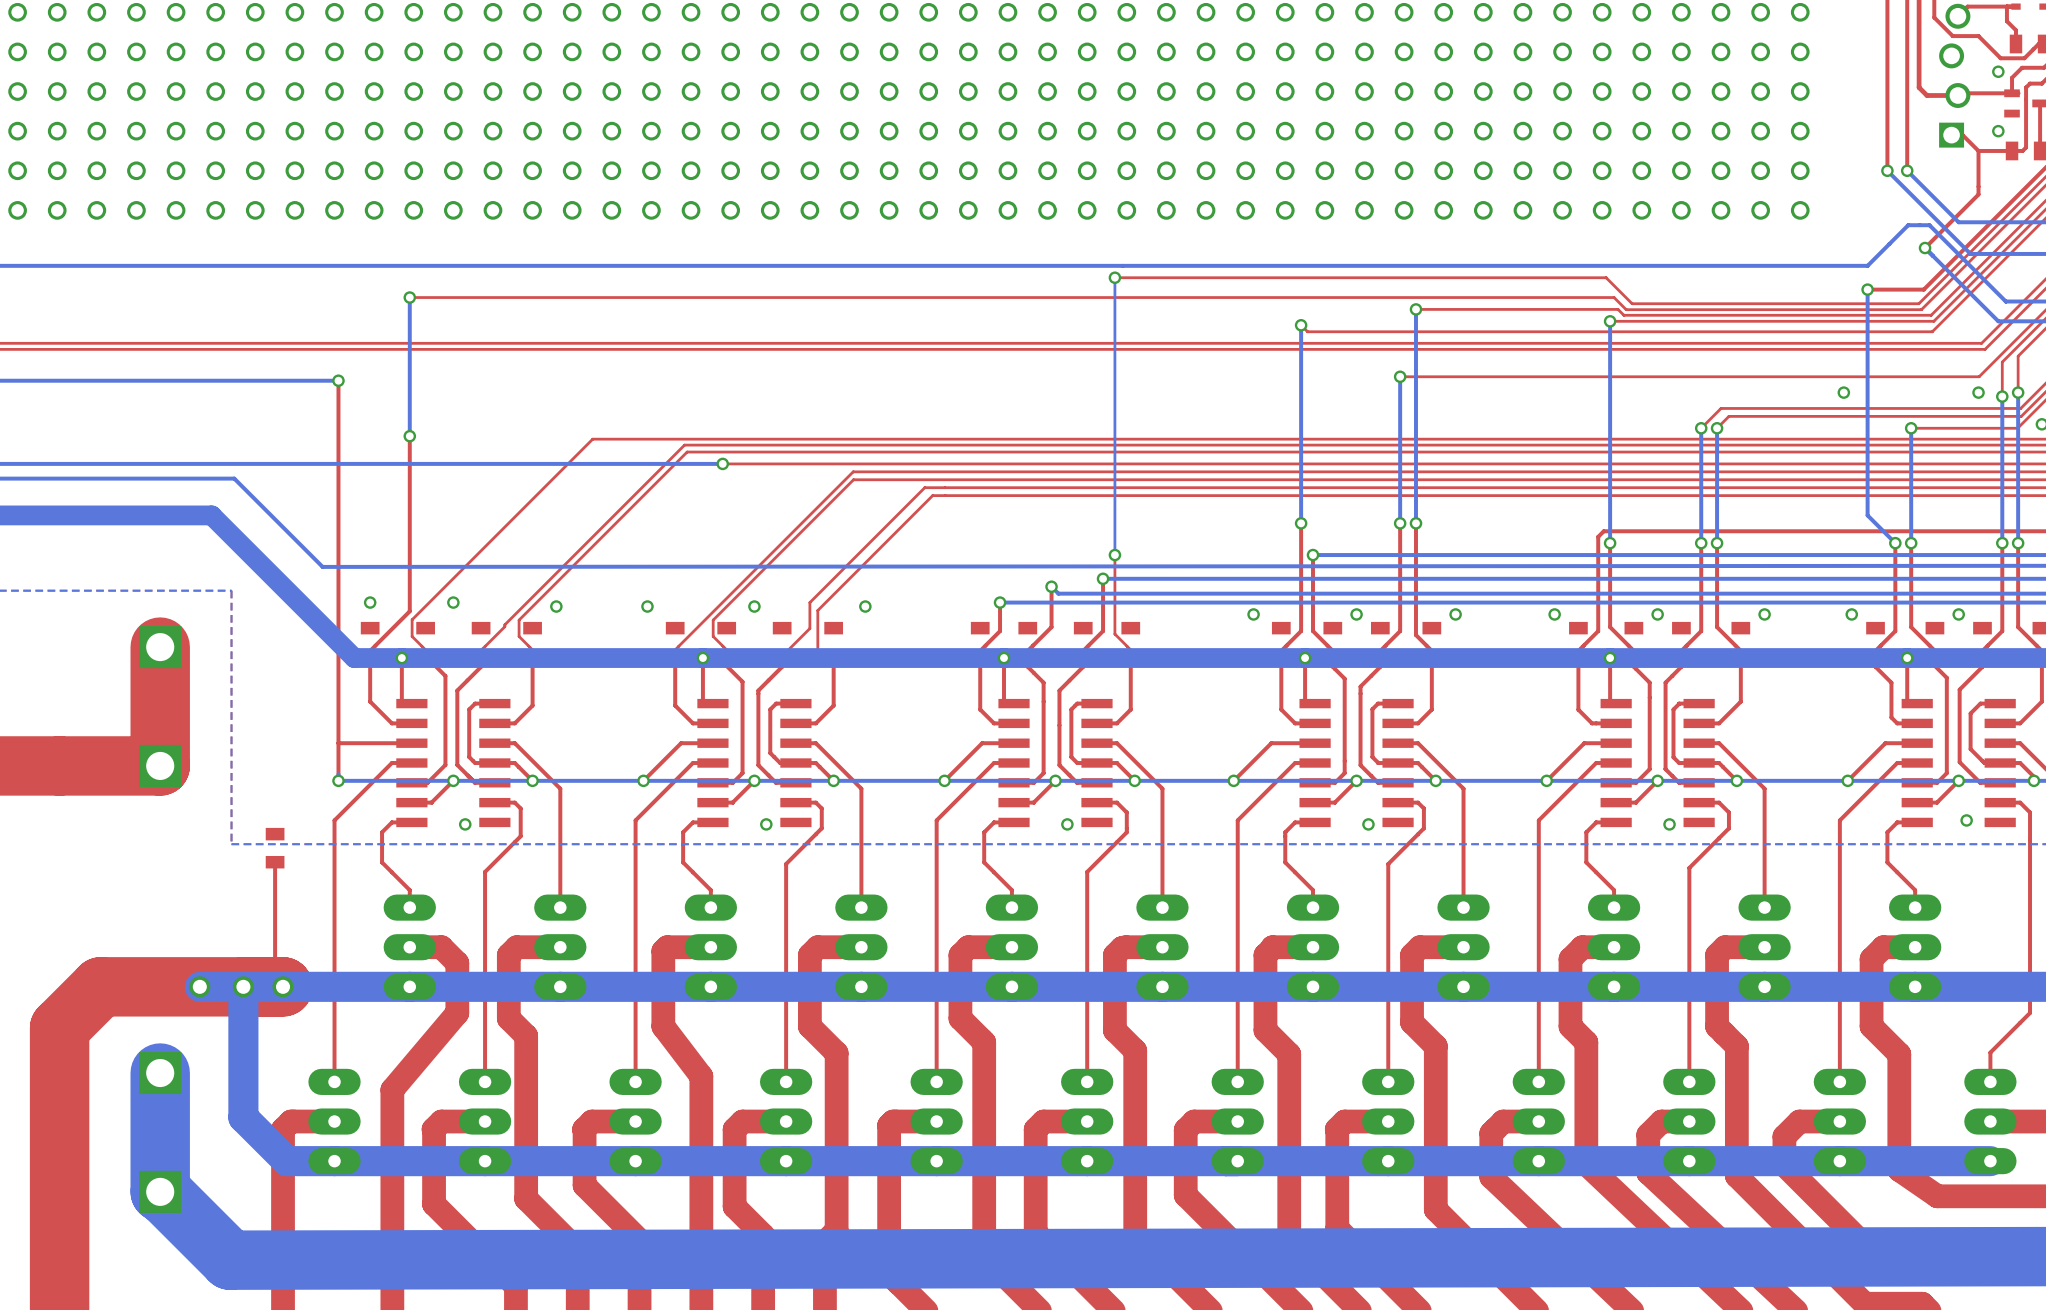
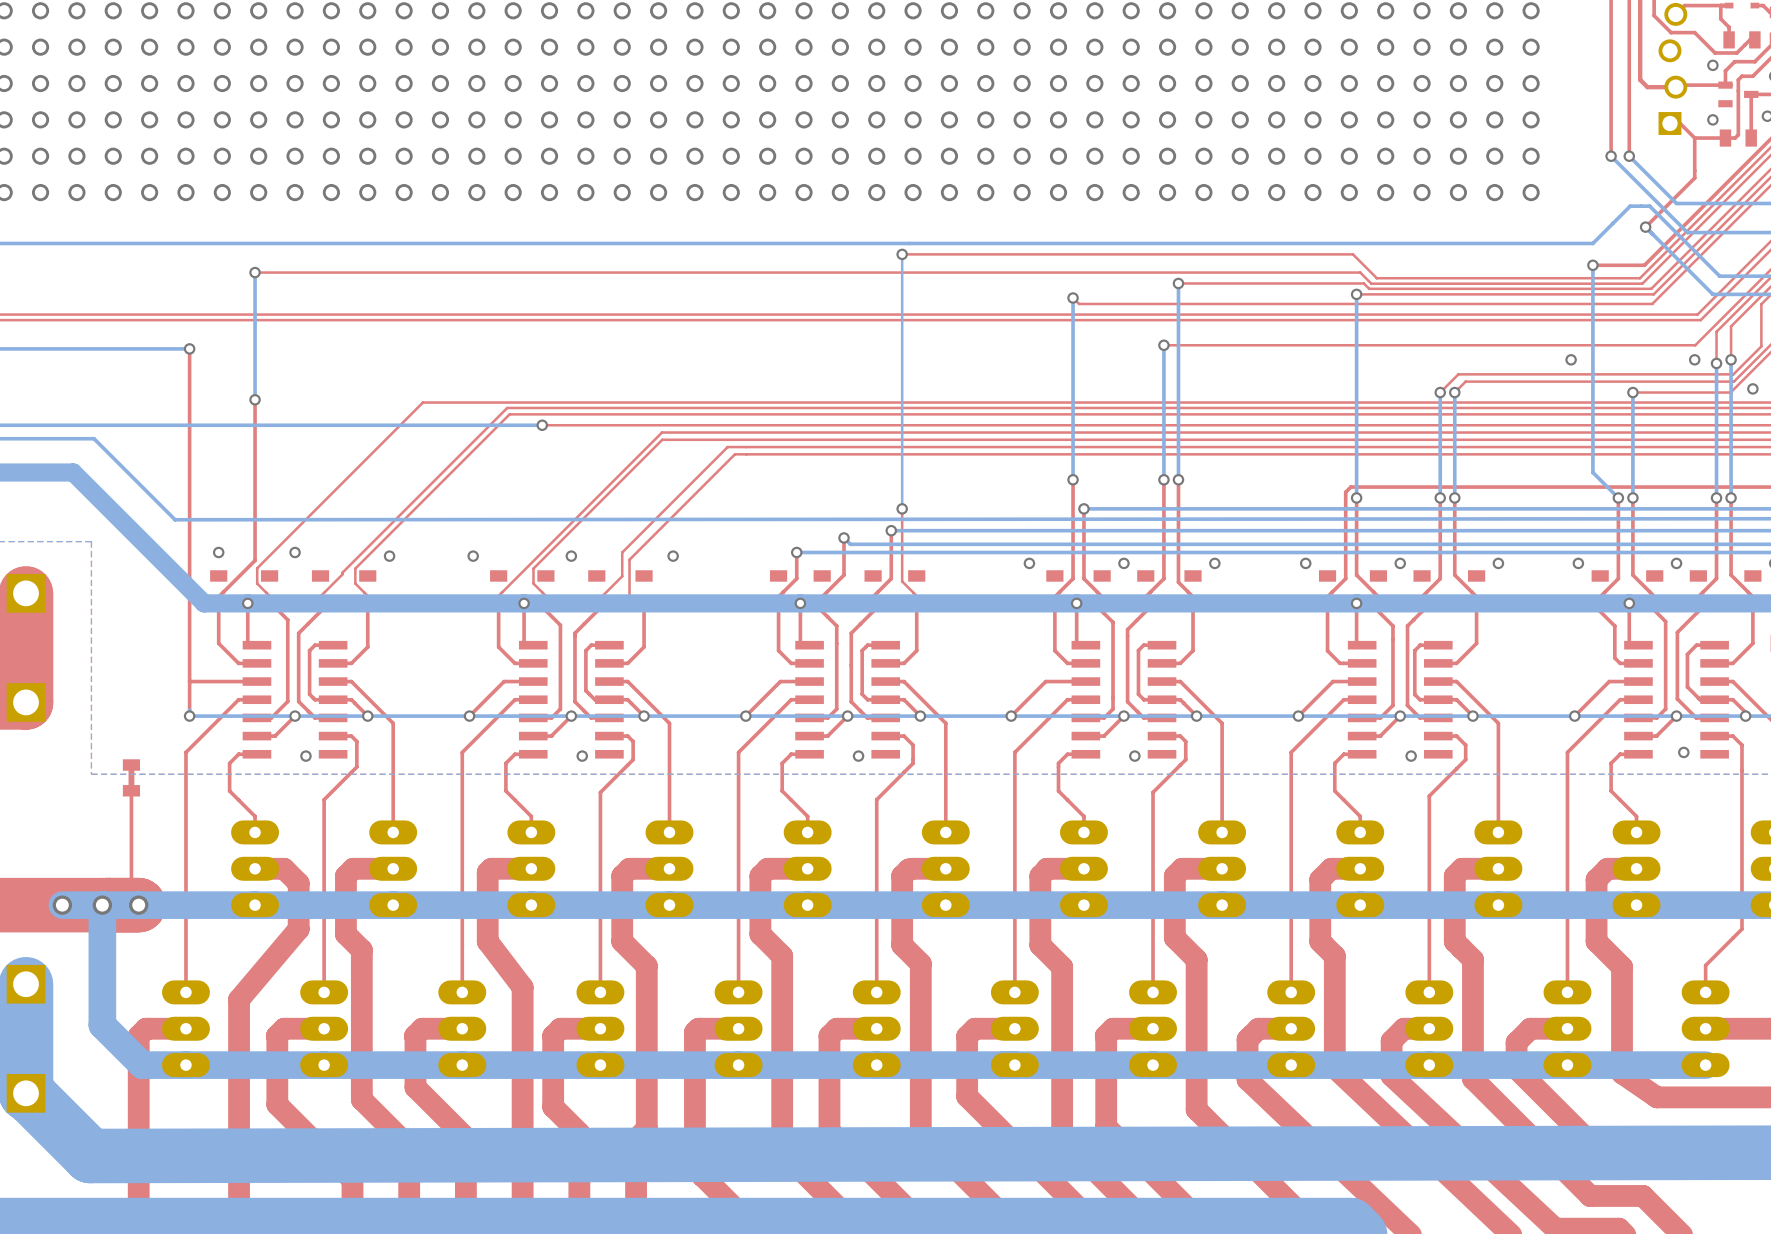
top track: none -> (131, 763) (131, 788)

